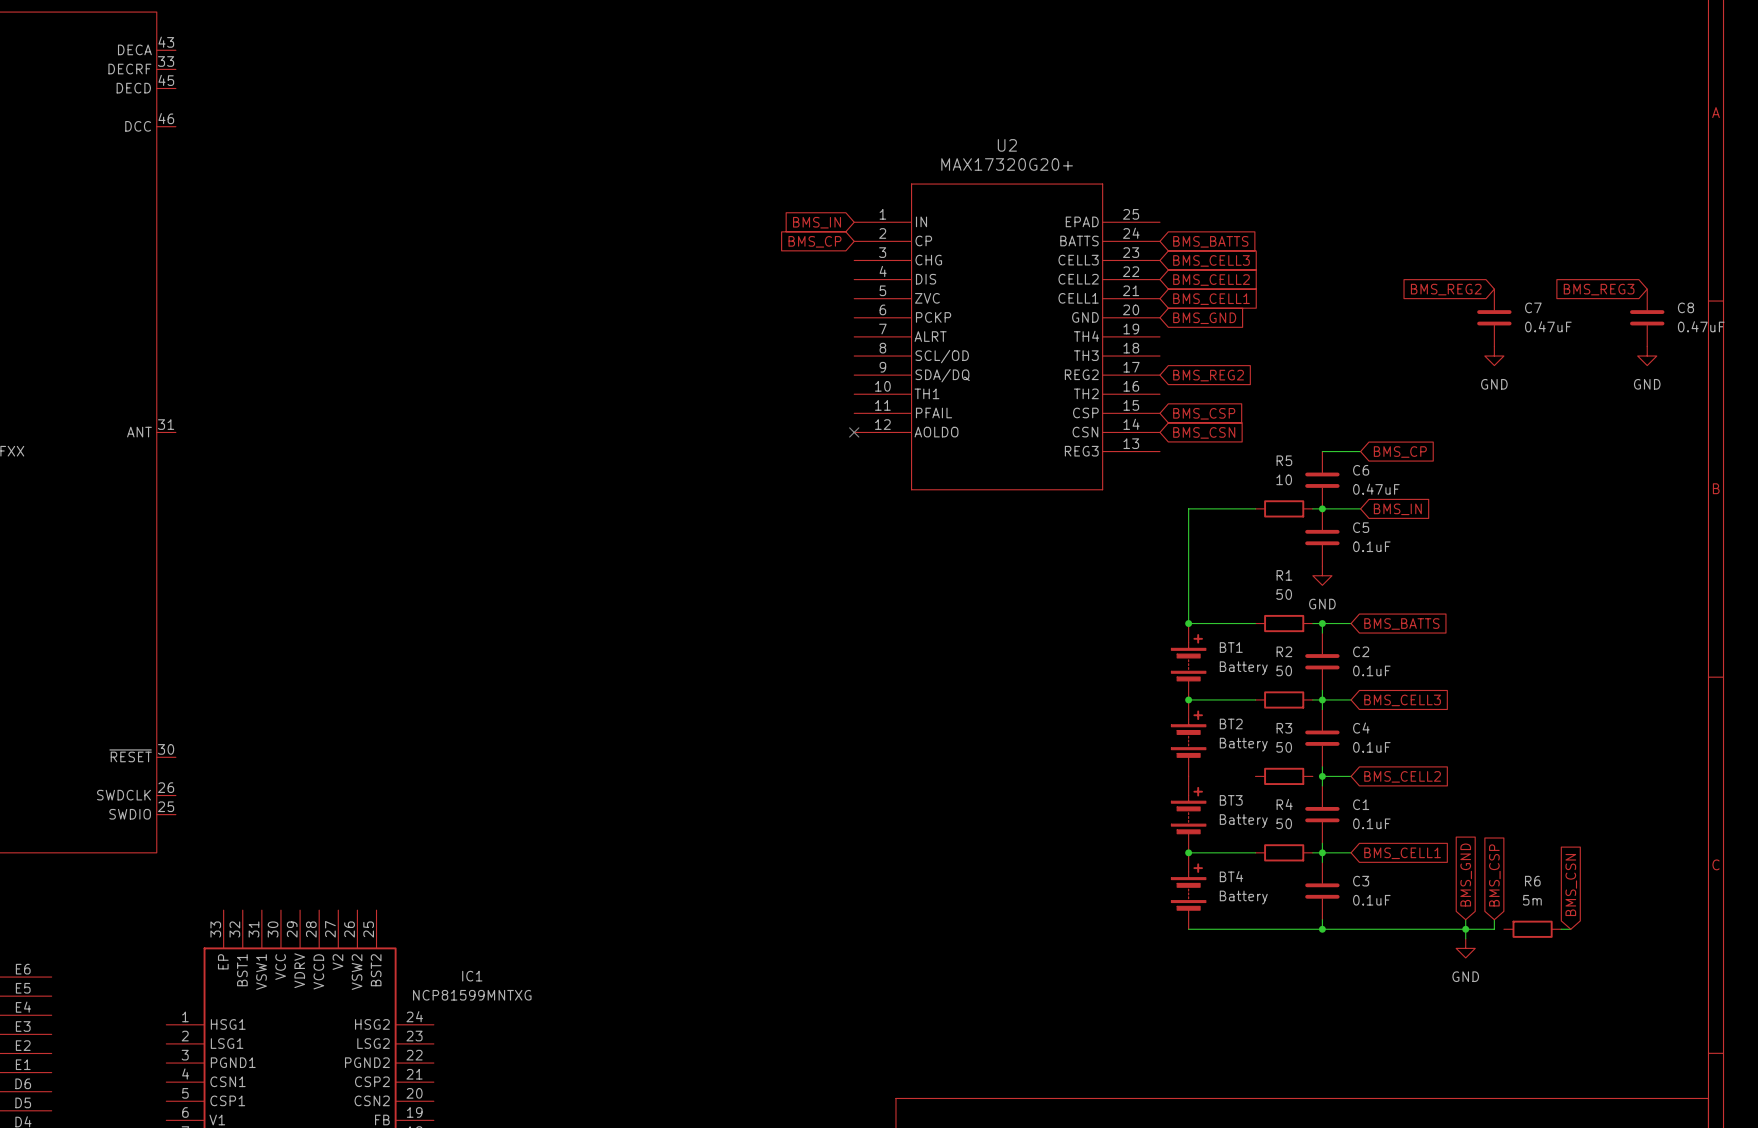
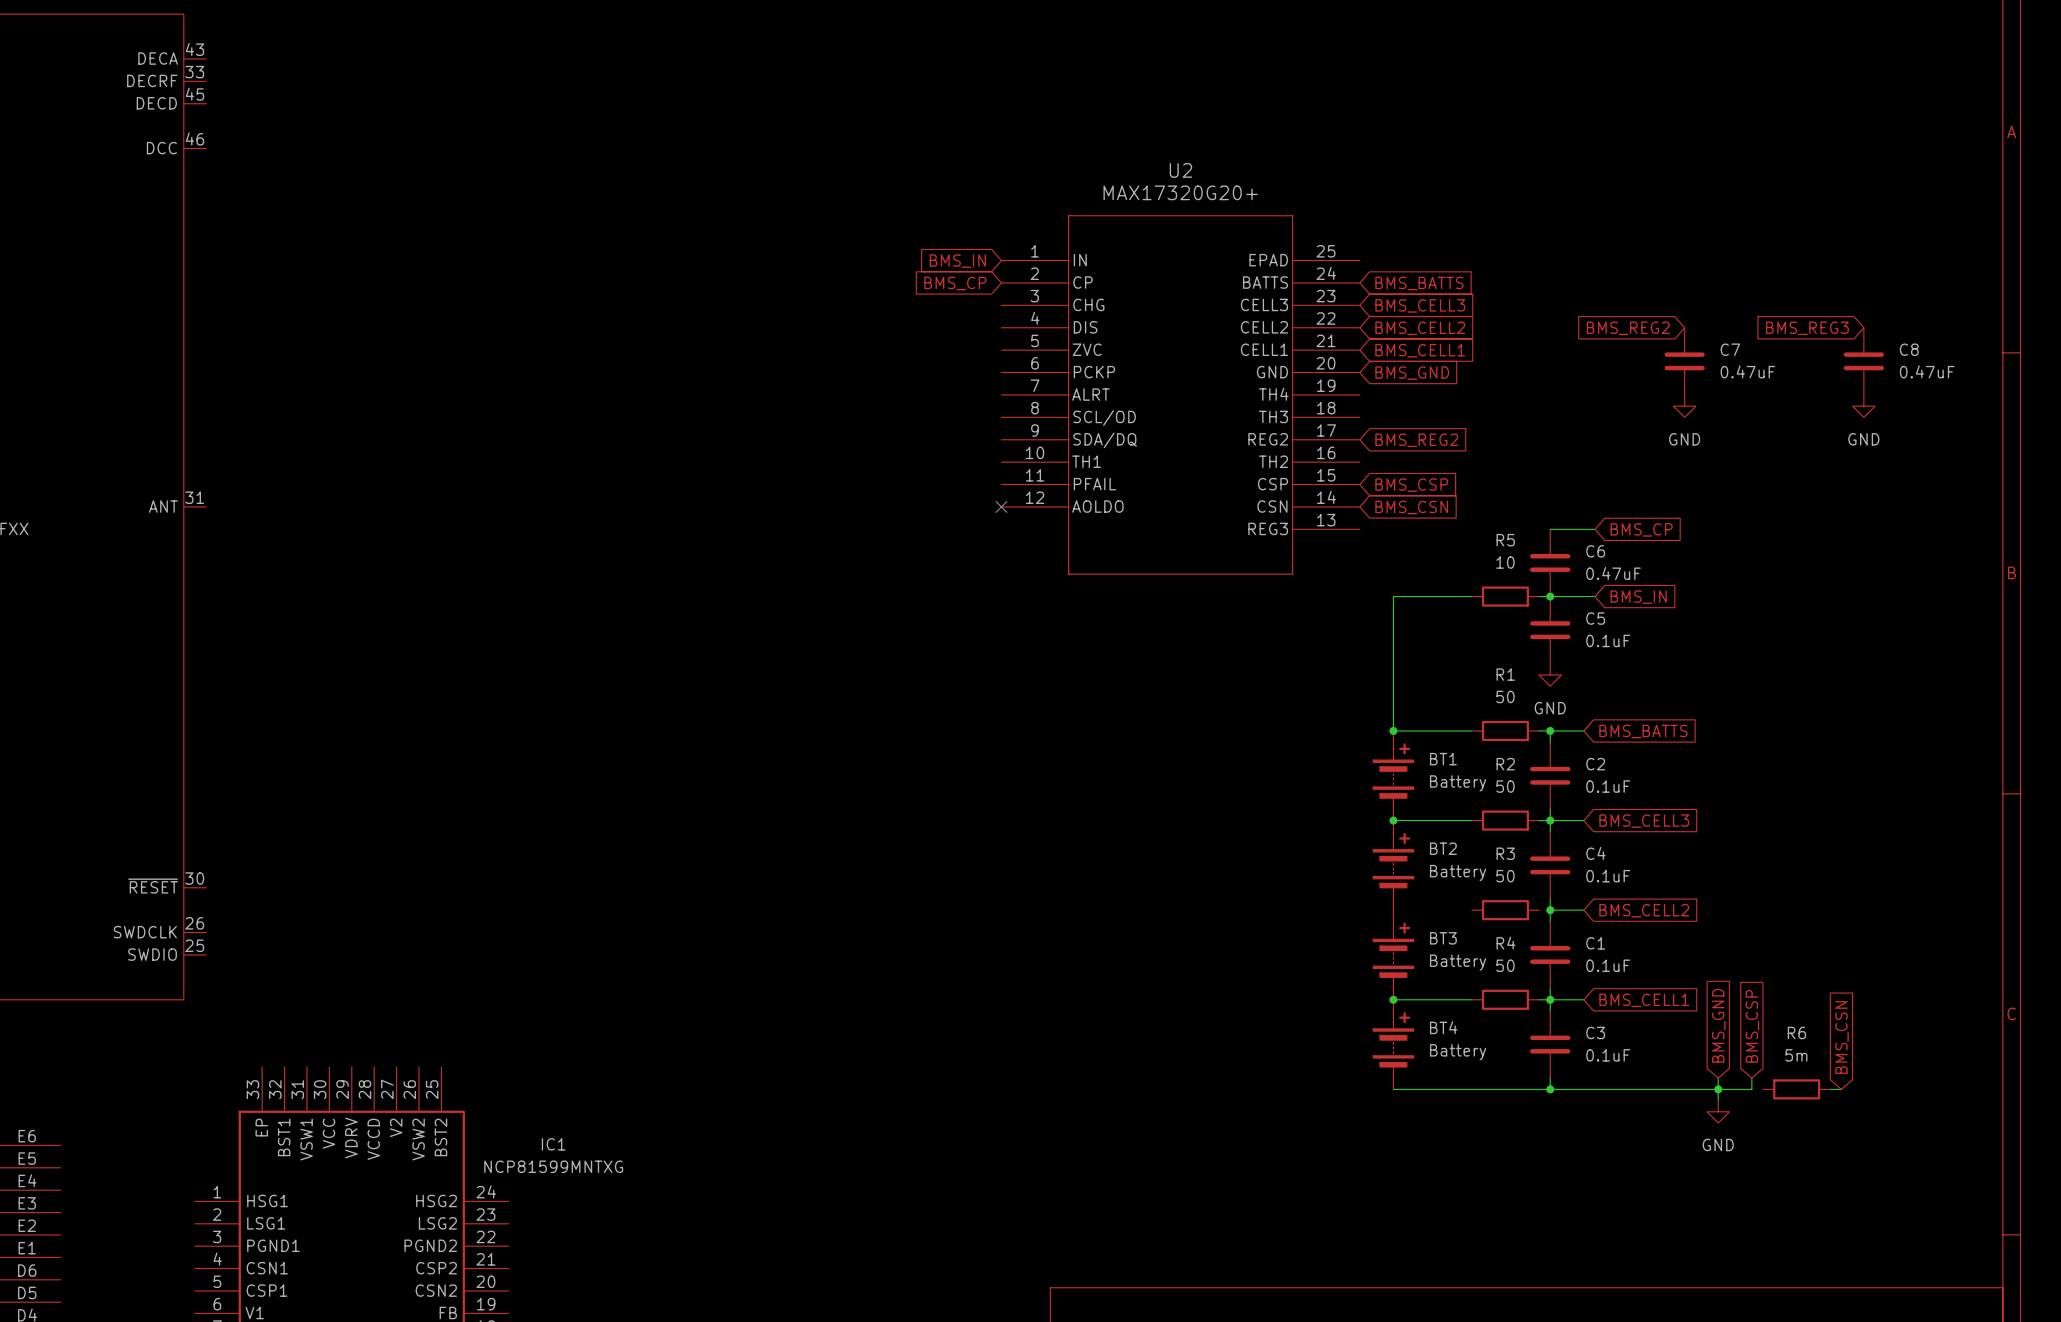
global label position: BMS_REG2 (1446, 289) -> BMS_REG2 (1628, 328)
global label position: BMS_REG3 (1599, 289) -> BMS_REG3 (1807, 328)
C7 position: (1494, 317) -> (1684, 361)
C8 position: (1647, 317) -> (1863, 361)
power symbol: none -> GND (1684, 406)
power symbol: none -> GND (1863, 406)
power symbol: GND (1494, 356) -> none
power symbol: GND (1647, 356) -> none

